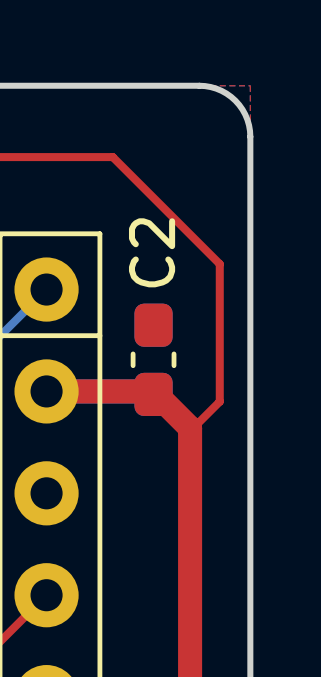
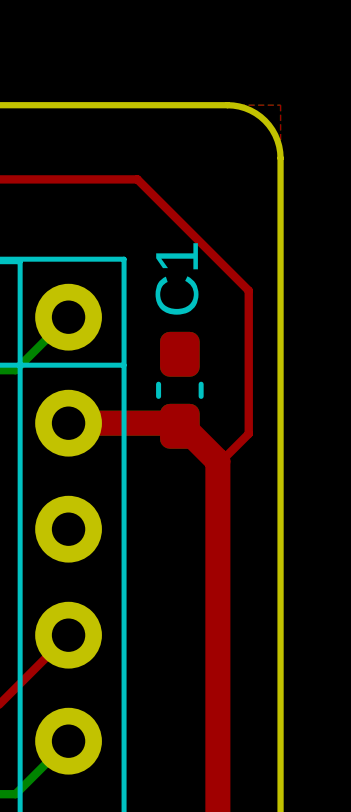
C2 name: C2 (152, 252) -> C1 (177, 278)

